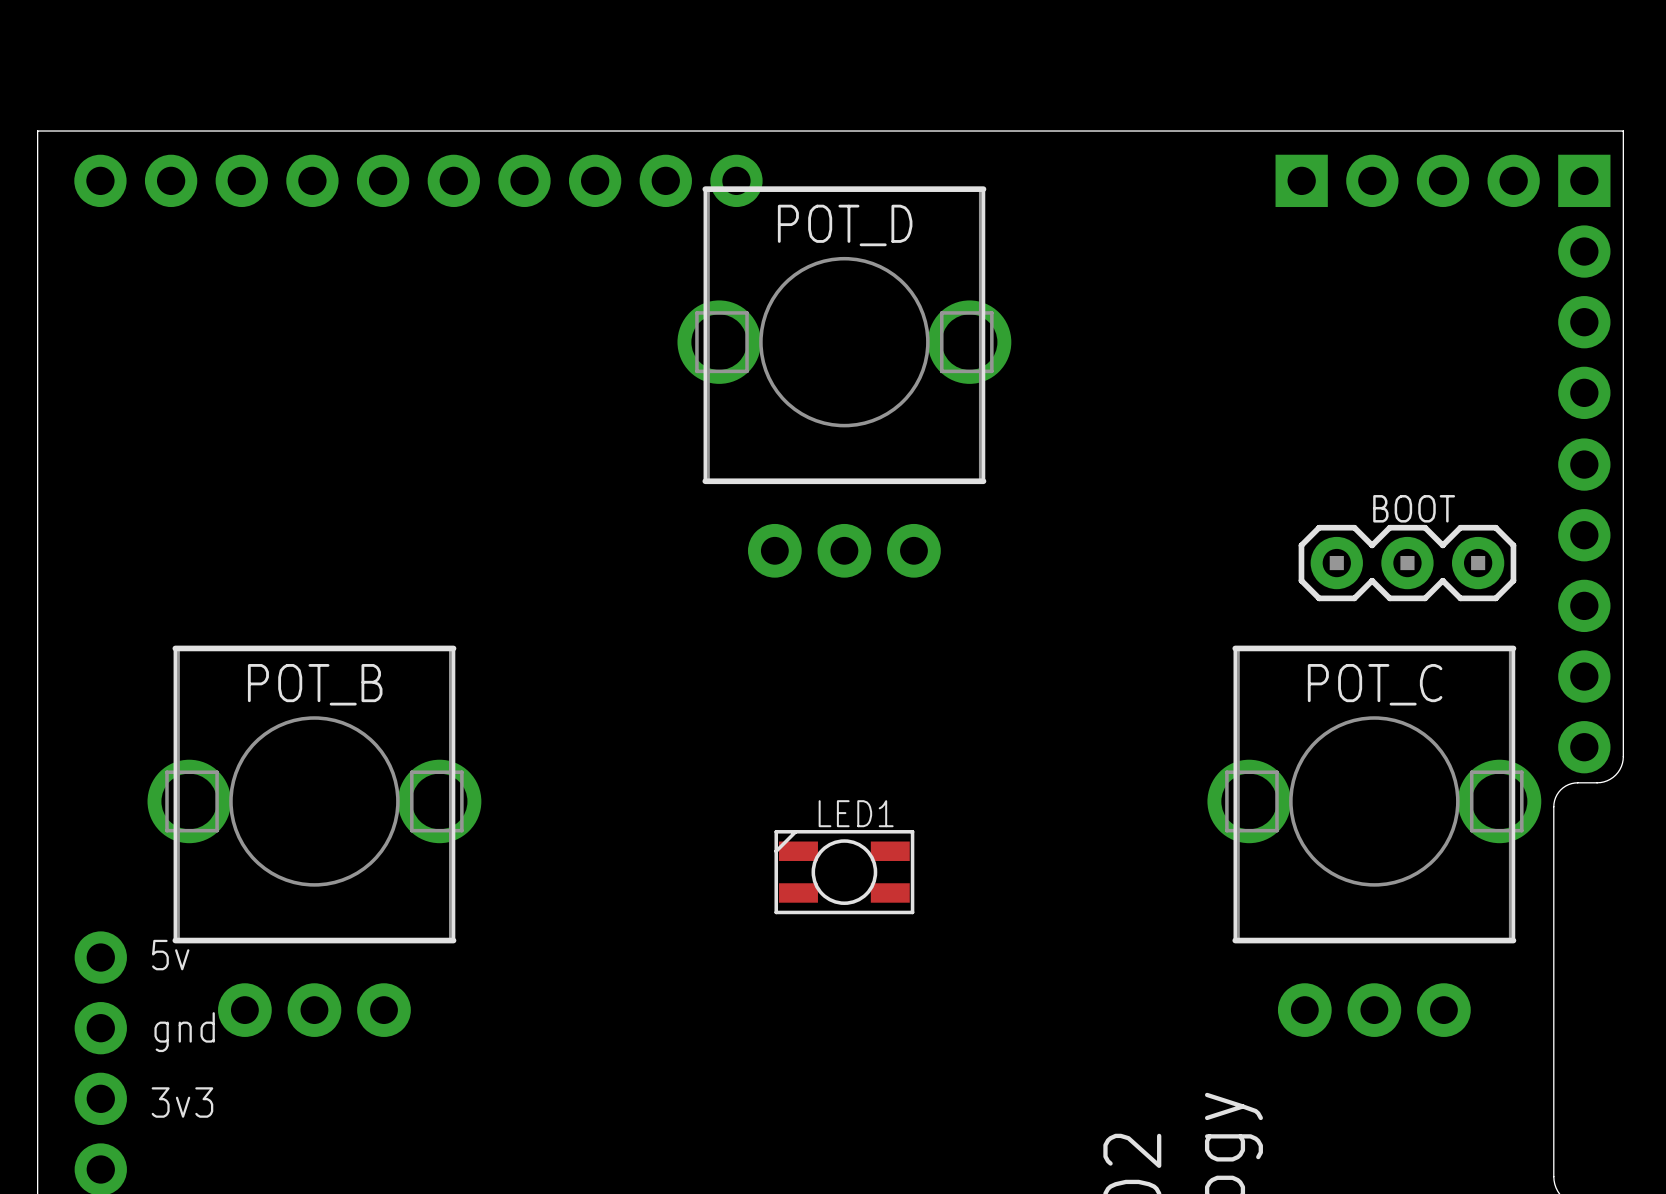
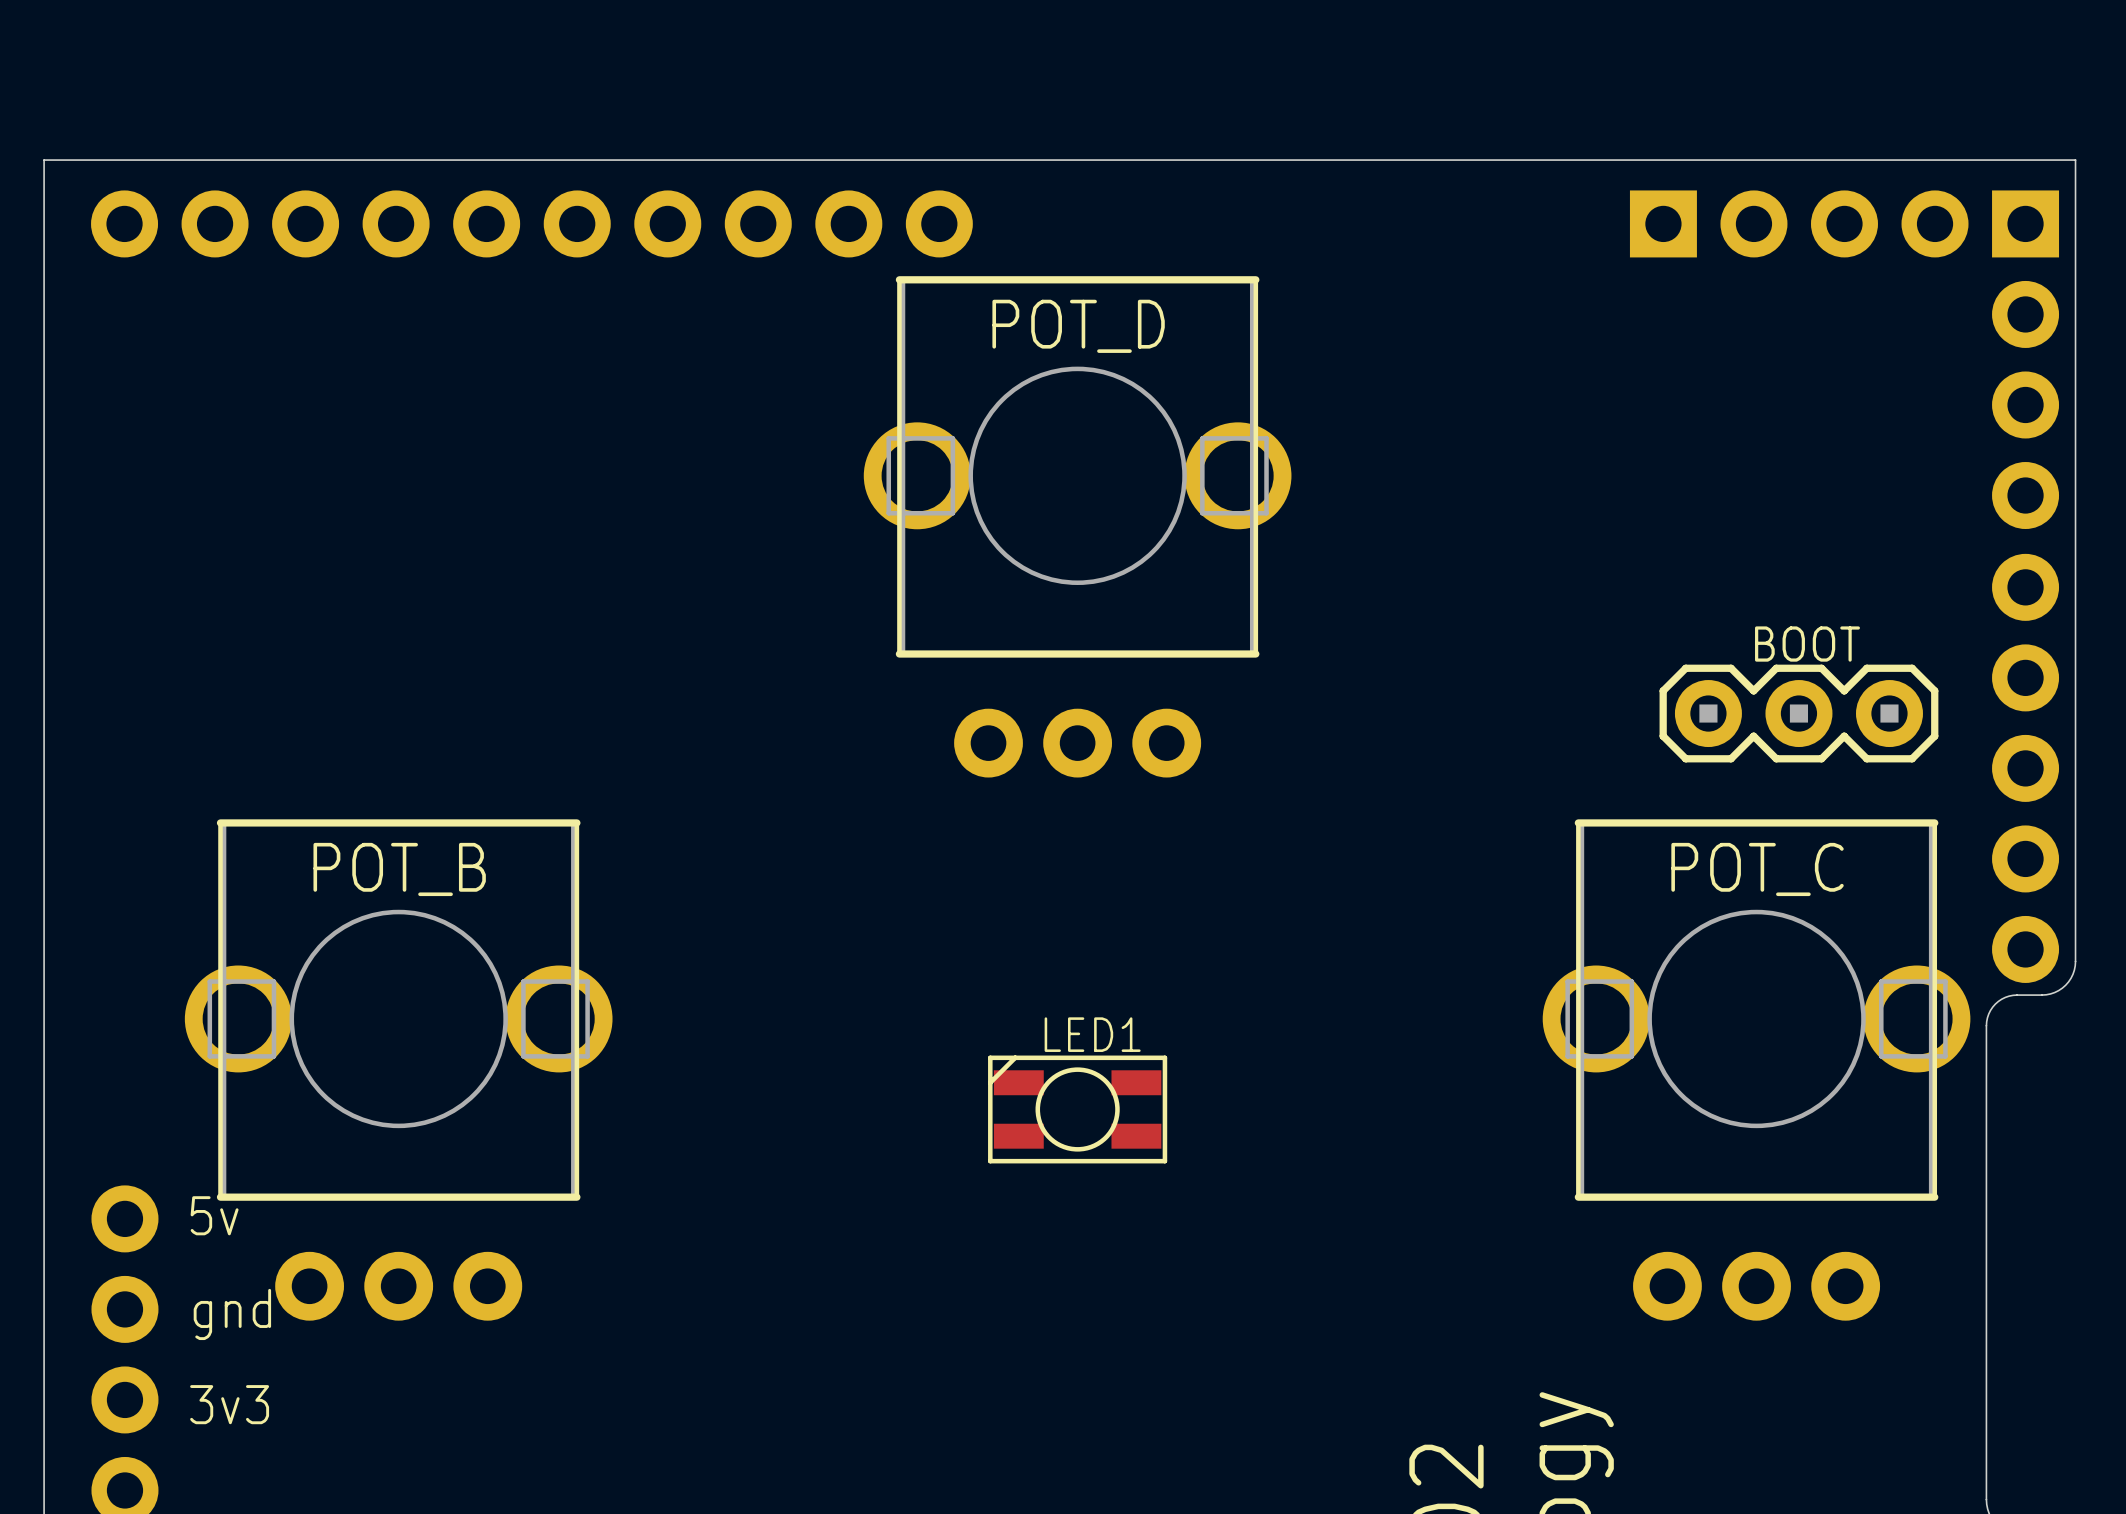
POT_D position: (844, 381) -> (1077, 526)

